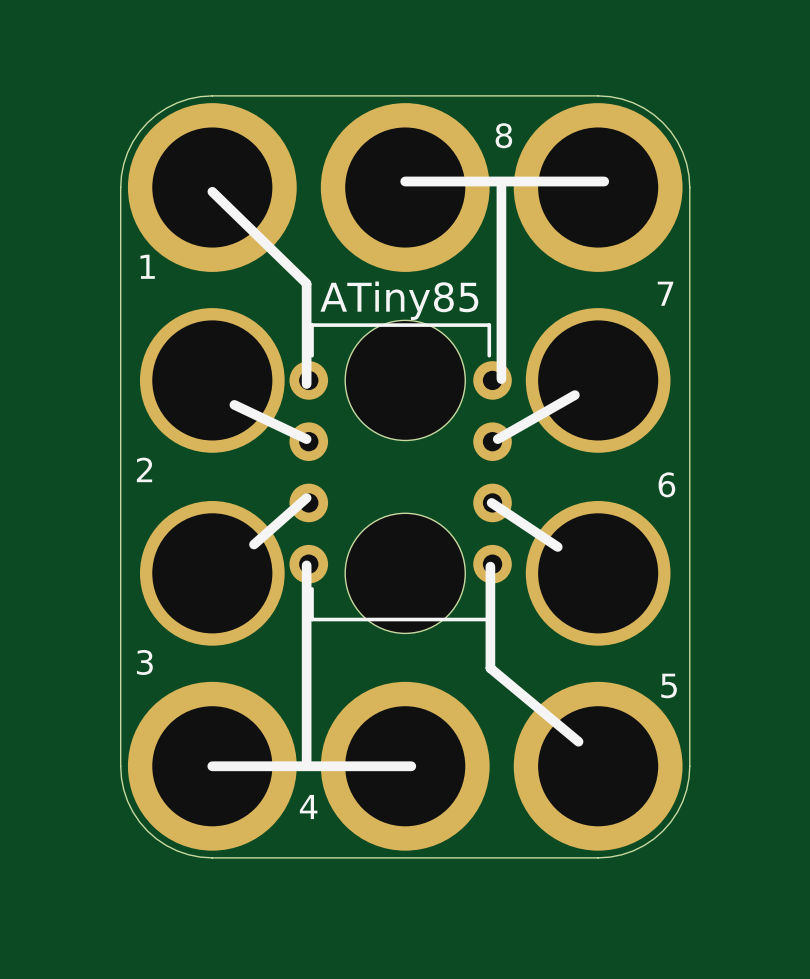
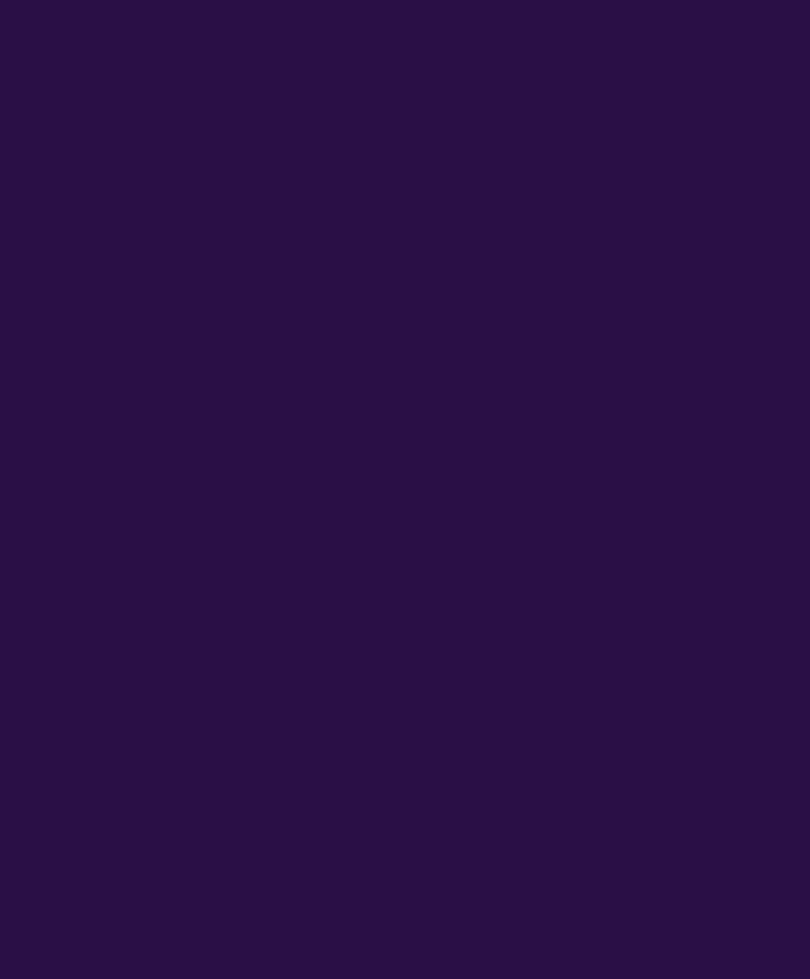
part: (405, 476) -> none

